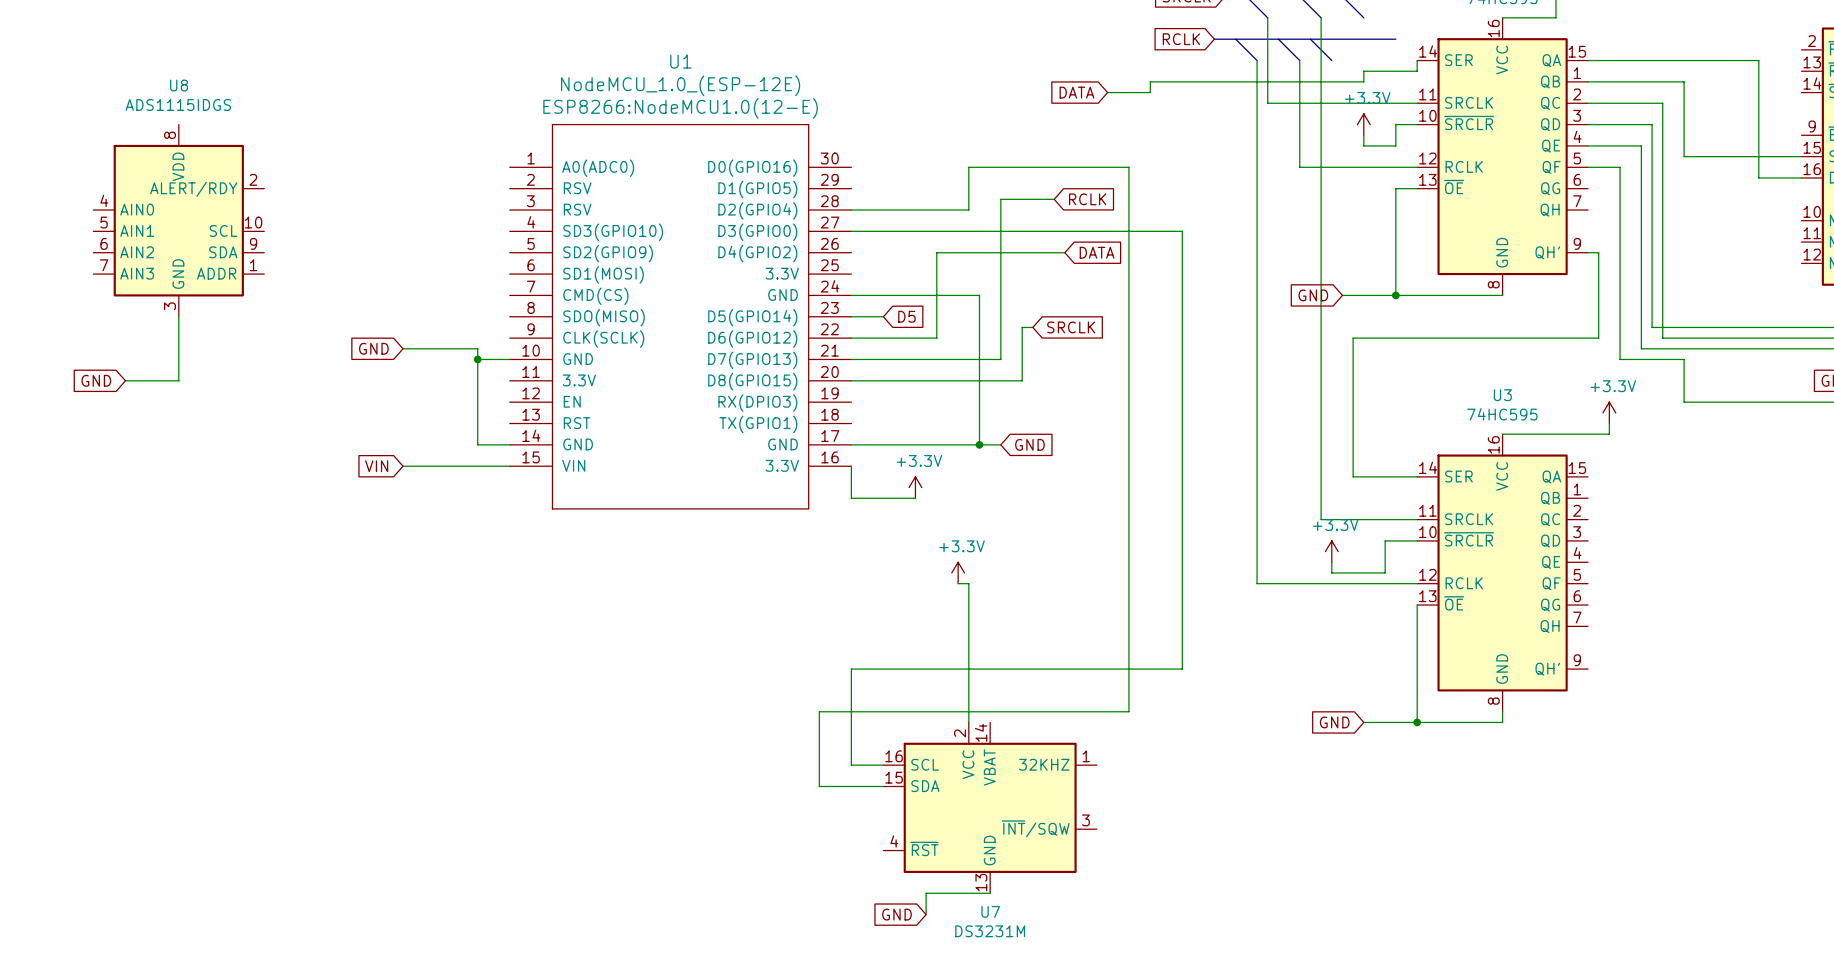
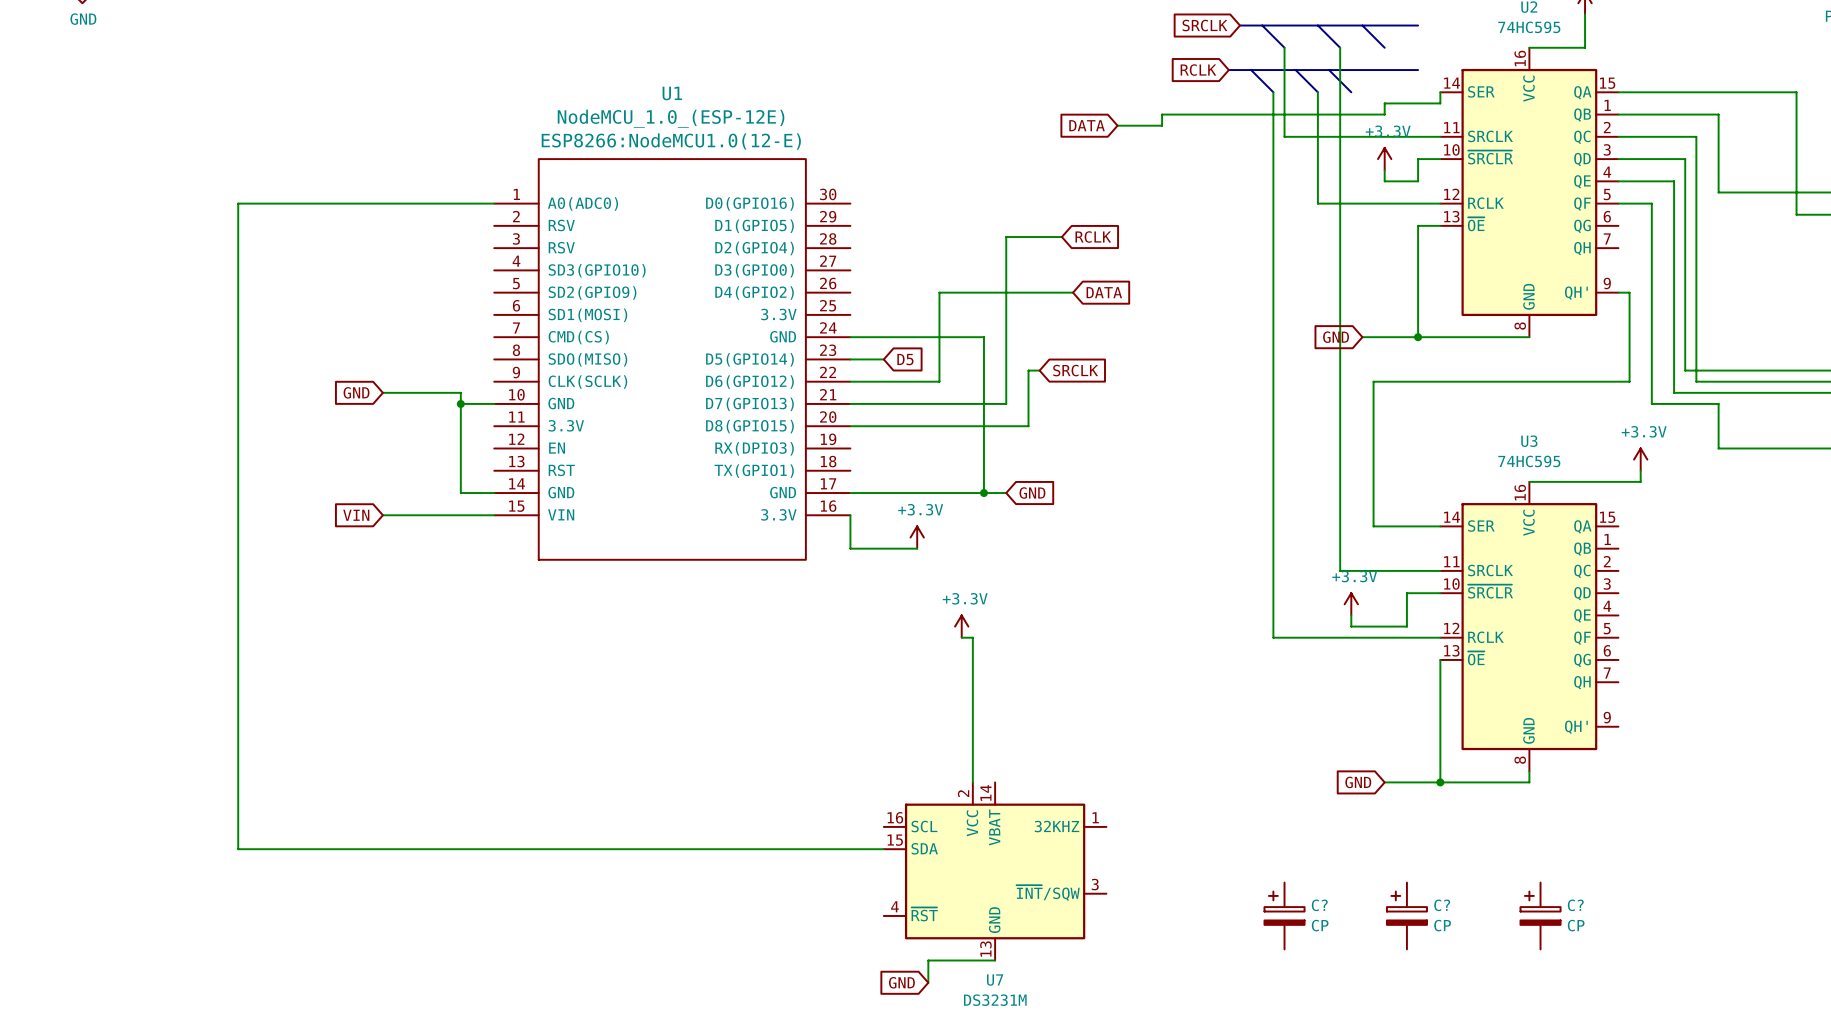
wire: (851, 210) (968, 210) (968, 167) (1128, 167) (1128, 711) (819, 711) (819, 786) -> (494, 203) (238, 203) (238, 849) (817, 849)
U8: ADS1115IDGS (178, 220) -> none
wire: (851, 231) (1182, 231) (1182, 669) (851, 669) (851, 765) (883, 765) -> none
wire: (178, 316) (178, 380) (125, 380) -> none
global label: GND (96, 380) -> none
C?: none -> CP (1284, 915)
C?: none -> CP (1406, 915)
C?: none -> CP (1540, 915)

